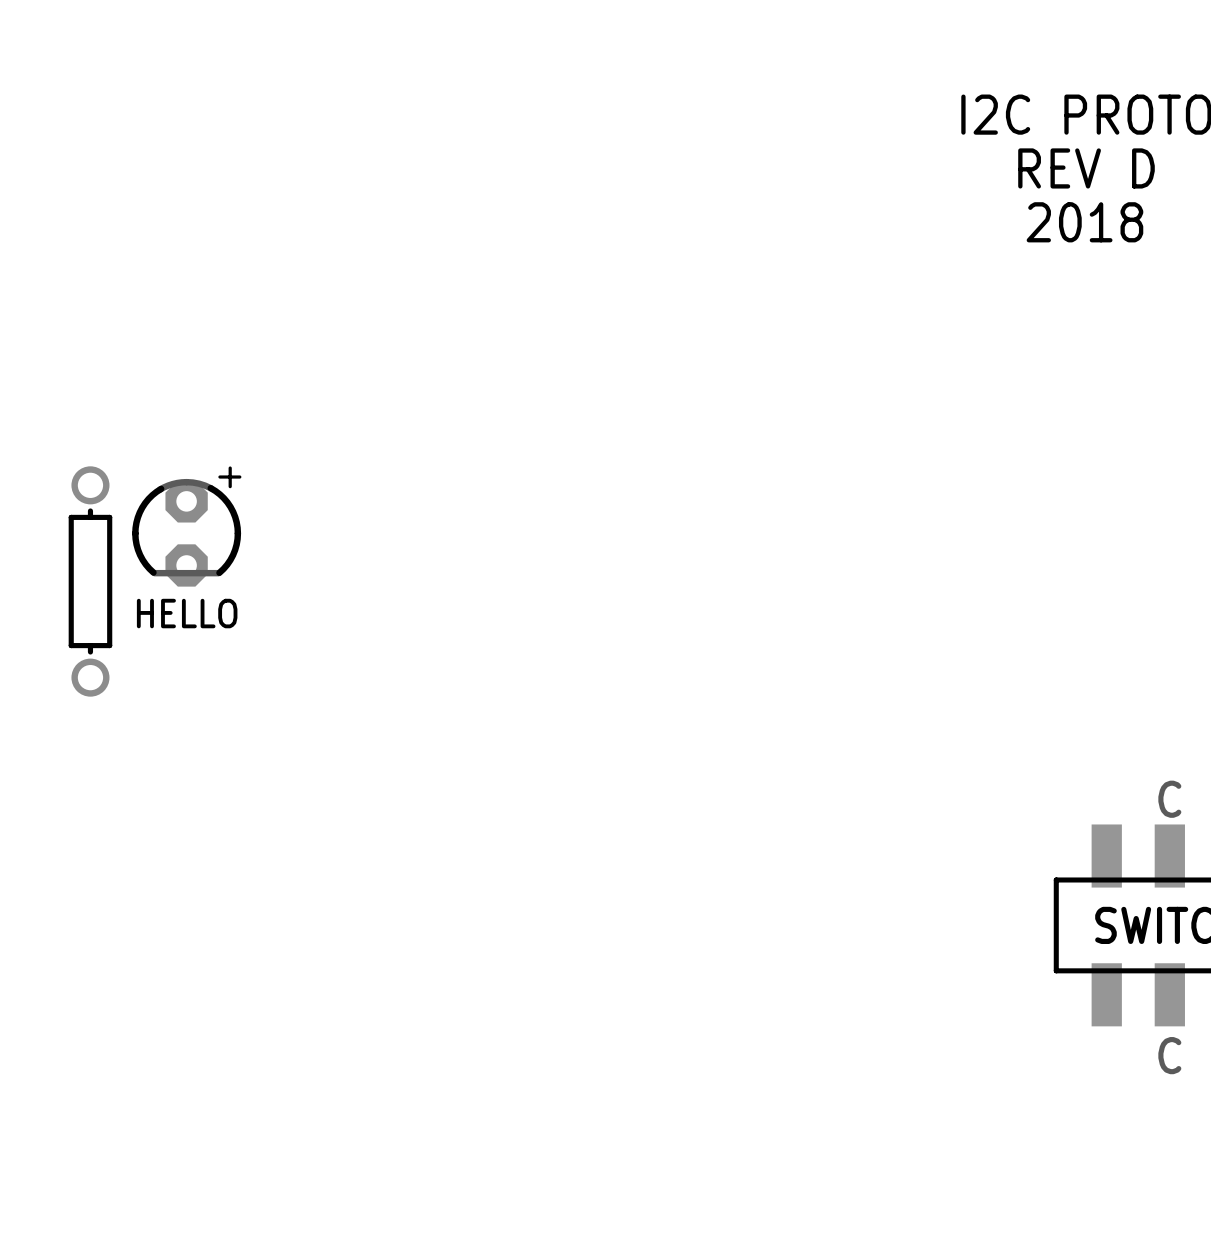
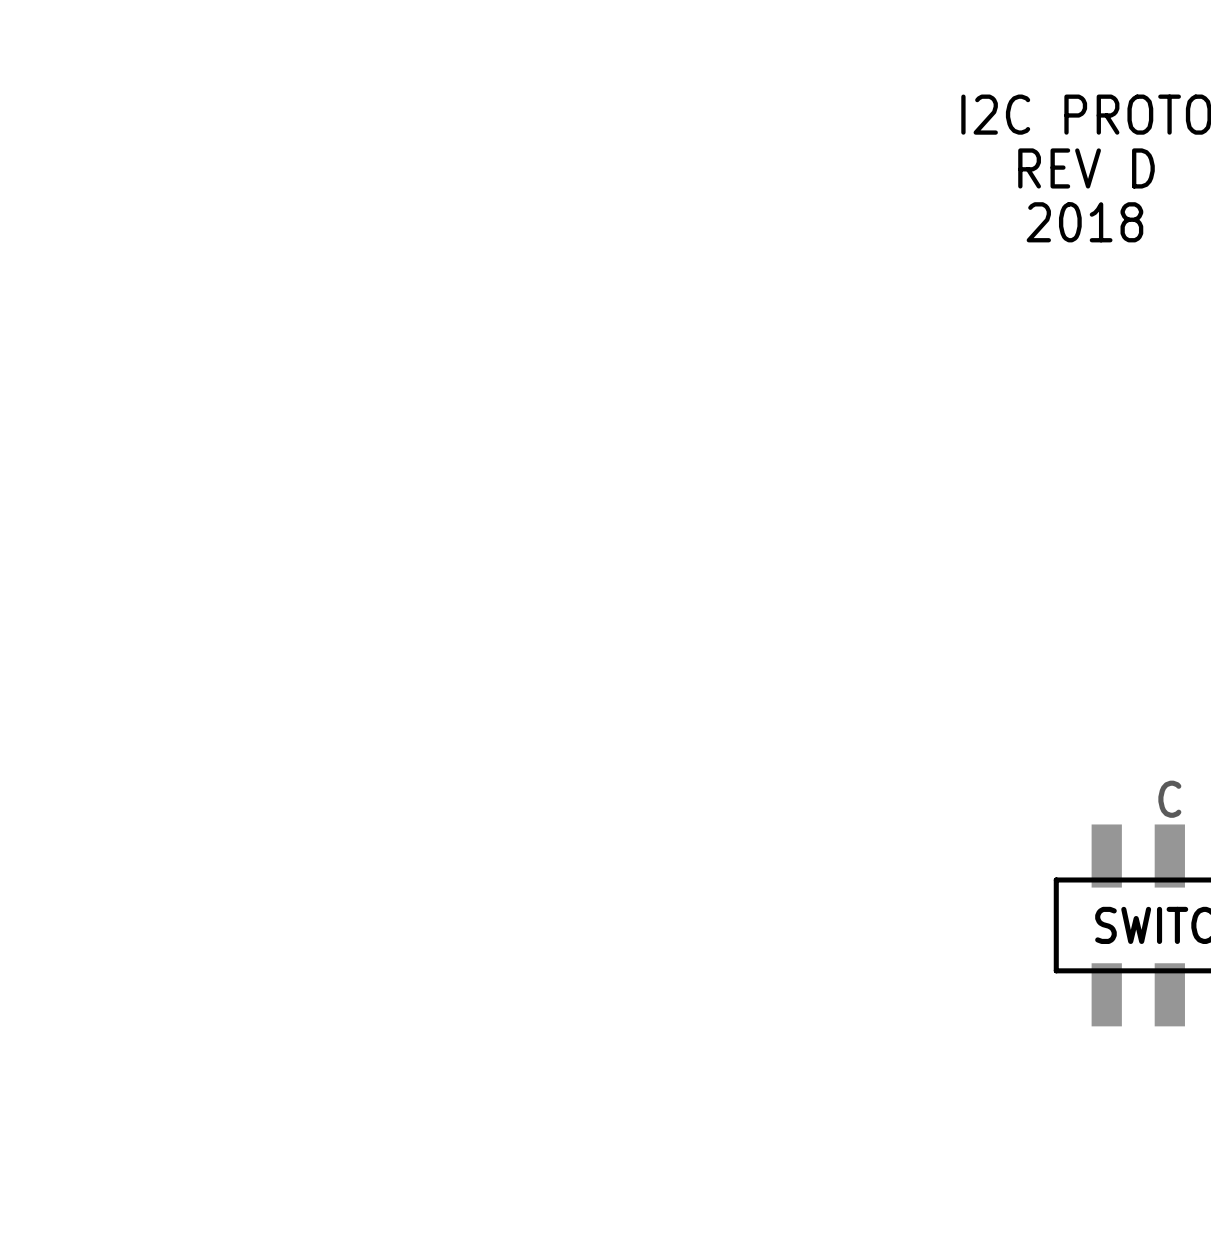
part: (186, 526) -> none
part: (90, 581) -> none
text: HELLO (187, 613) -> none
part text: C (1169, 1055) -> none

